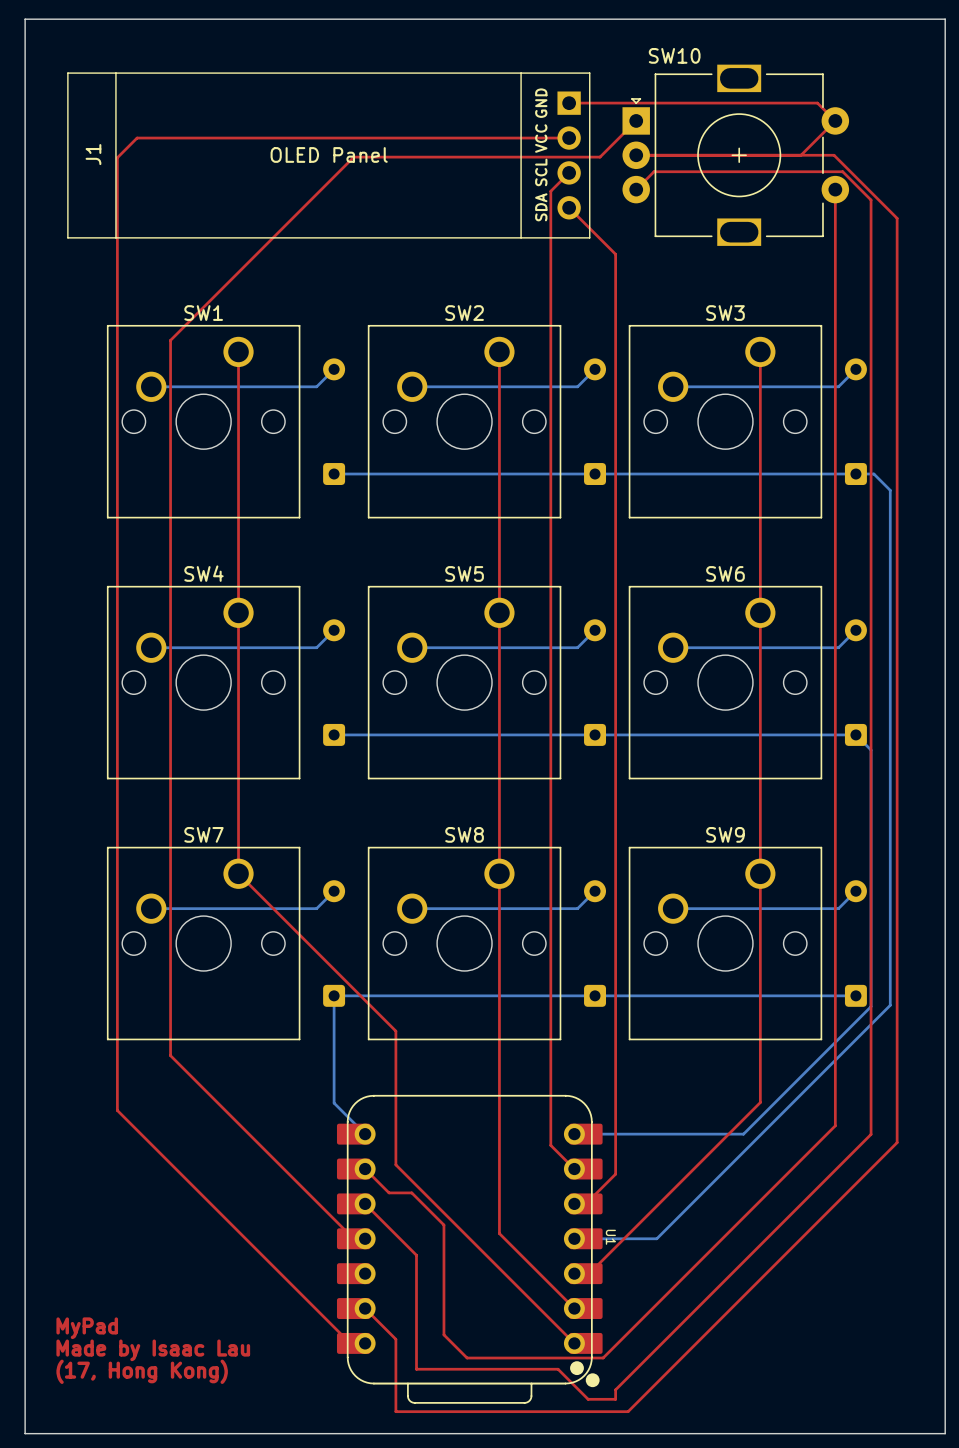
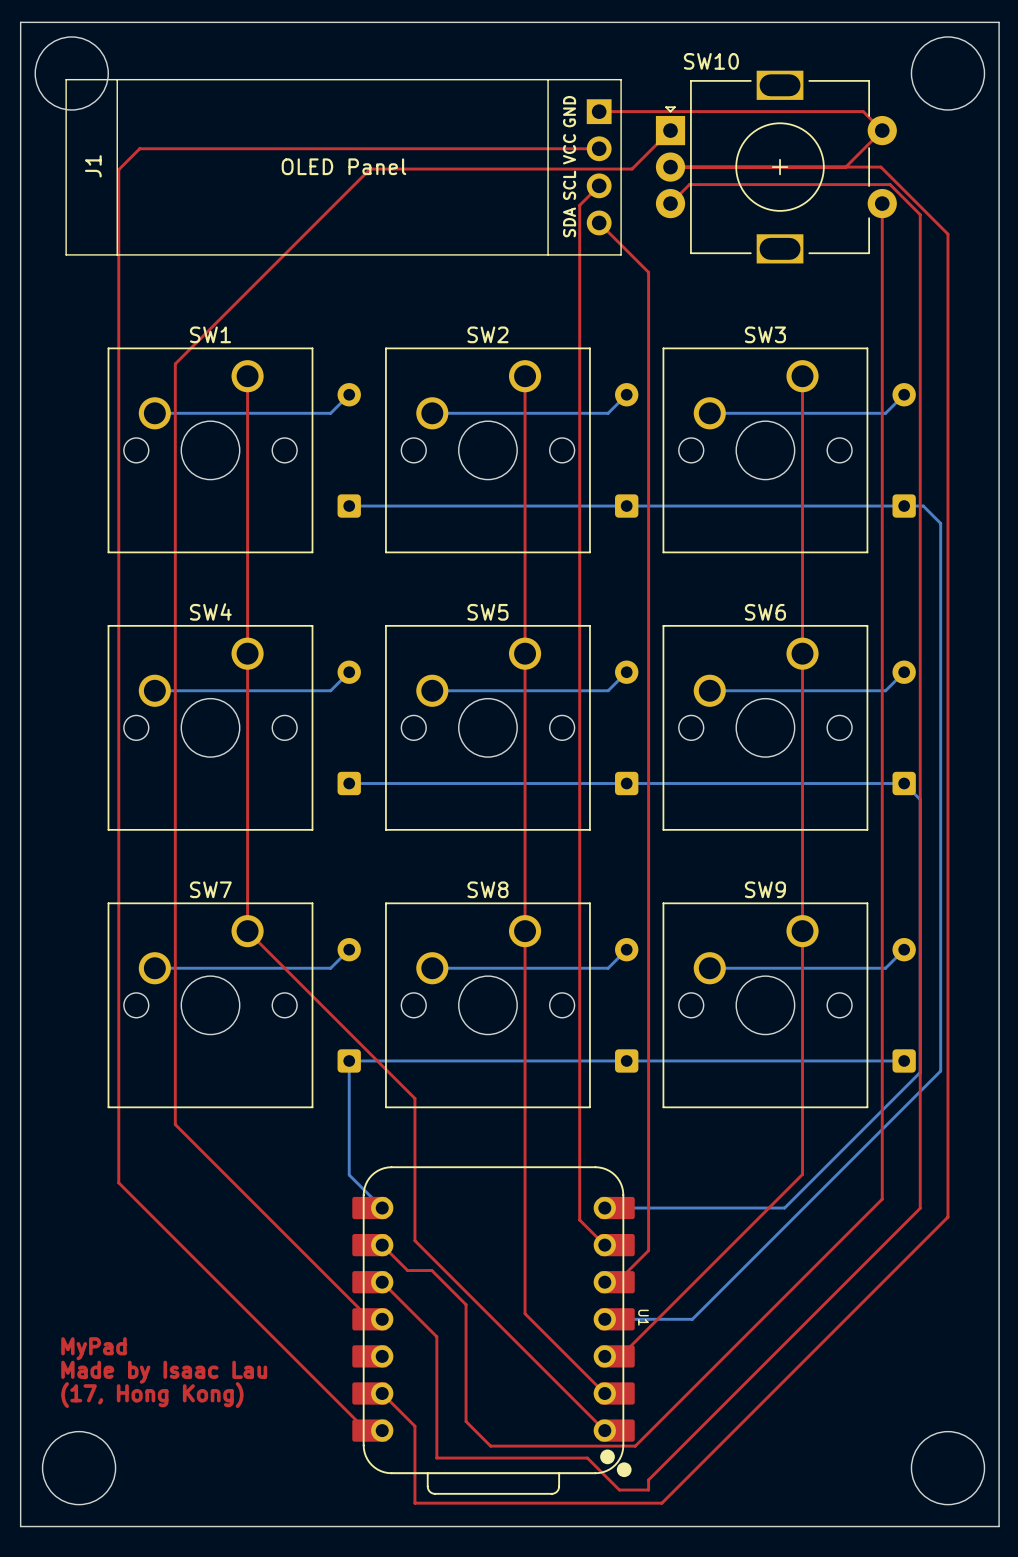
round board edge: none -> [34, 36, 109, 111]
round board edge: none -> [911, 36, 985, 111]
text position: MyPad (87, 1328) -> MyPad (93, 1348)
round board edge: none -> [42, 1431, 116, 1505]
round board edge: none -> [911, 1431, 985, 1505]
text position: Made by Isaac Lau (153, 1350) -> Made by Isaac Lau (164, 1372)
text position: (17, Hong Kong) (142, 1371) -> (17, Hong Kong) (152, 1395)

